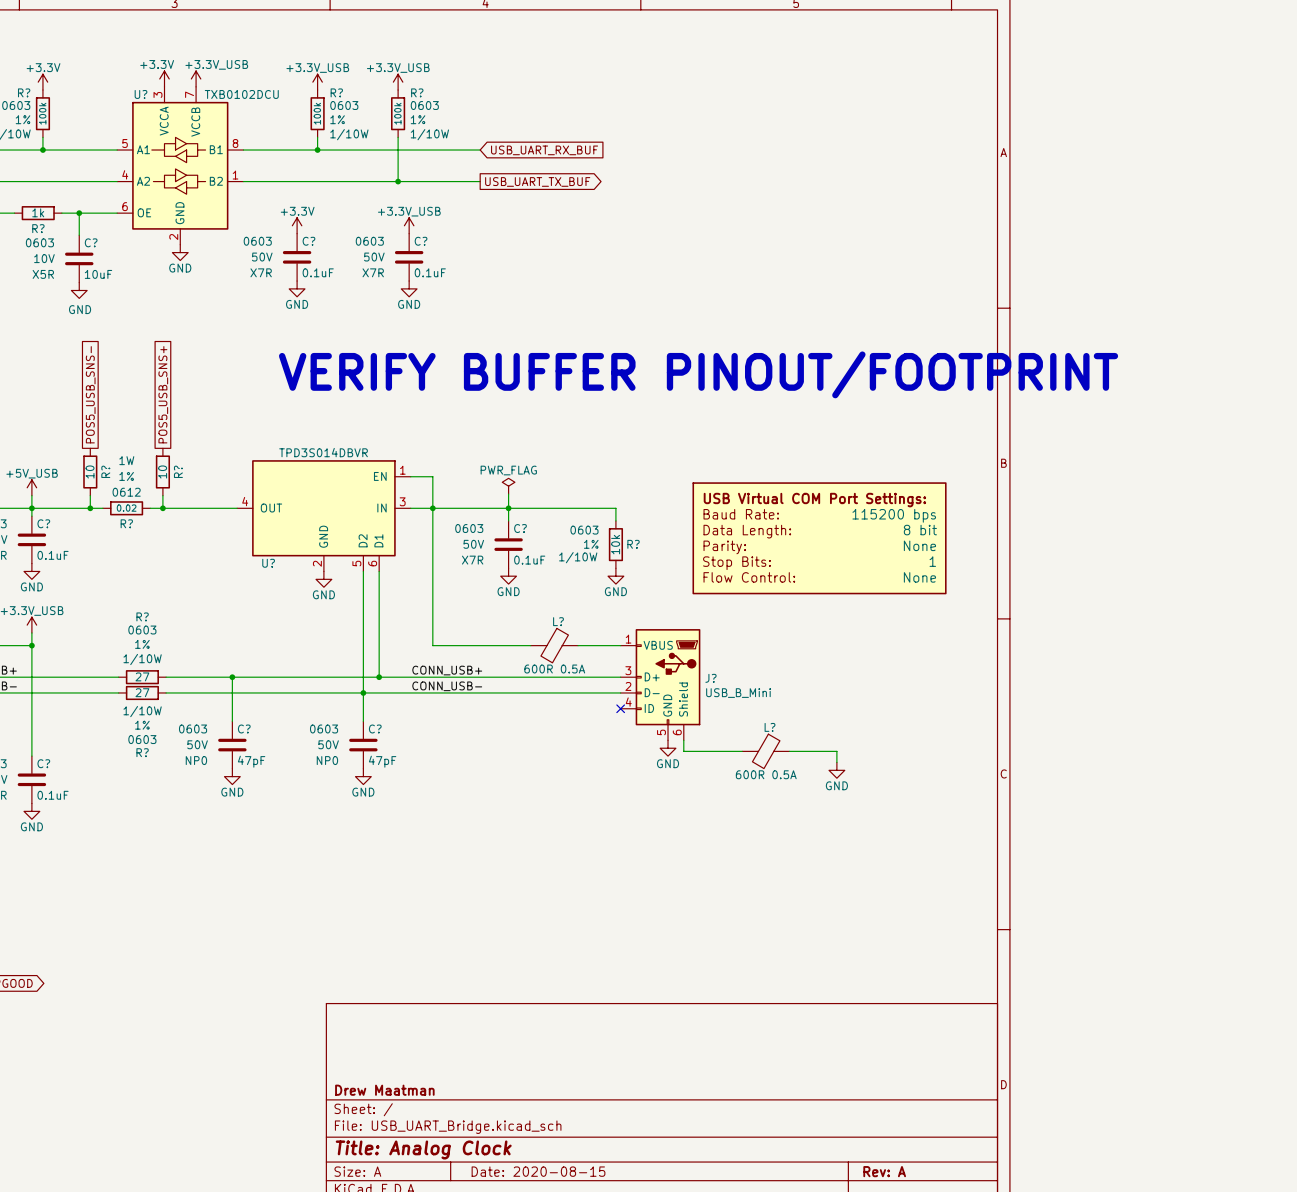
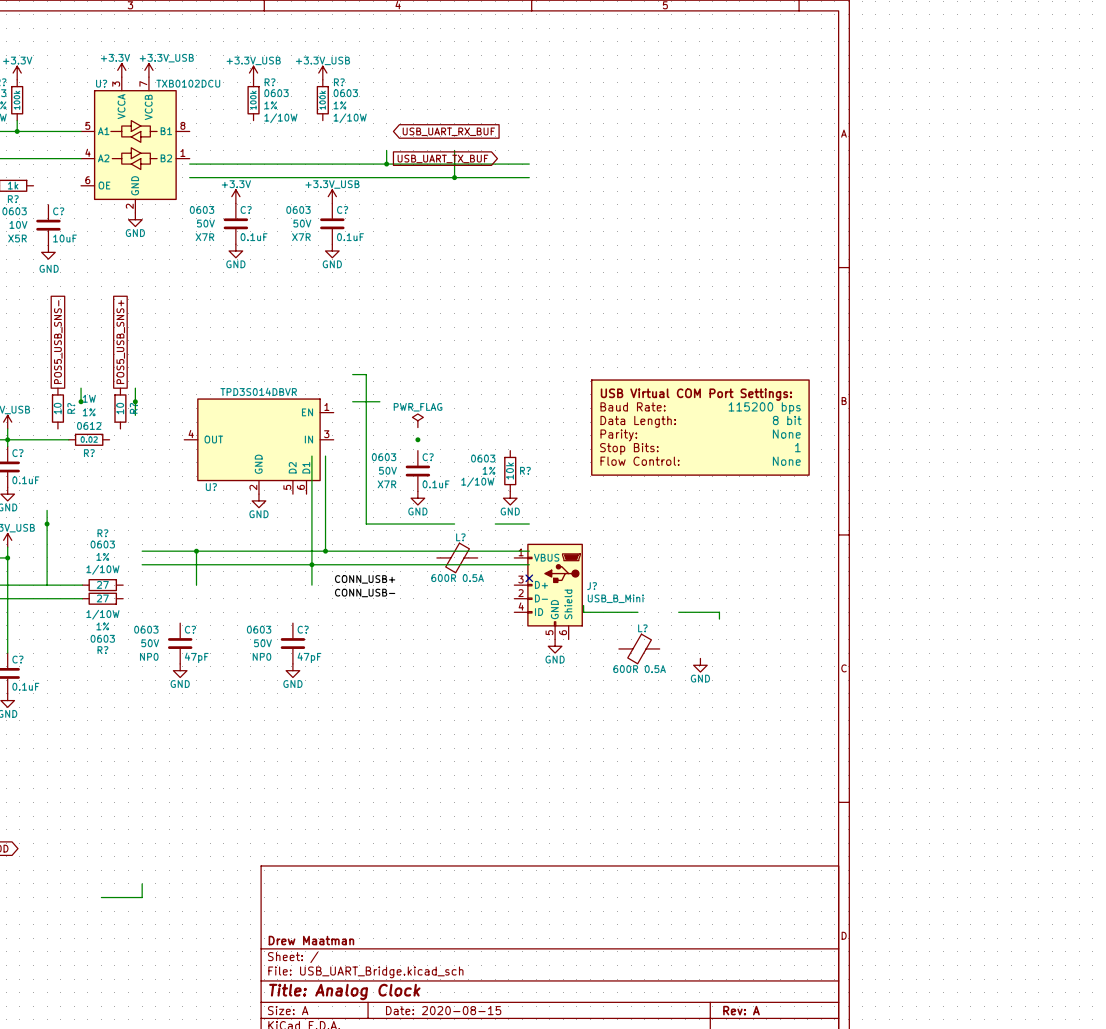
wire: (317, 137) (317, 150) -> none
wire: (398, 137) (398, 181) -> none
wire: (243, 150) (480, 150) -> none
junction: (317, 150) -> none
wire: none -> (386, 150) (386, 164)
wire: none -> (454, 150) (454, 177)
wire: (243, 181) (480, 181) -> none
junction: (398, 181) -> none
wire: none -> (189, 164) (529, 164)
junction: none -> (386, 164)
wire: none -> (189, 177) (529, 177)
junction: none -> (454, 177)
wire: (61, 213) (117, 213) -> none
wire: (79, 213) (79, 235) -> none
junction: (79, 213) -> none
text: VERIFY BUFFER PINOUT/FOOTPRINT (698, 374) -> none
wire: none -> (352, 374) (366, 374) (366, 524) (454, 524)
wire: none -> (81, 388) (81, 401)
wire: none -> (135, 388) (135, 415)
junction: none -> (81, 401)
junction: none -> (135, 401)
wire: none -> (352, 401) (379, 401)
wire: (410, 476) (432, 476) (432, 645) (530, 645) -> none
wire: (508, 494) (508, 520) -> none
wire: (90, 495) (90, 508) -> none
wire: (162, 495) (162, 508) -> none
junction: (90, 508) -> none
wire: (150, 508) (237, 508) -> none
junction: (162, 508) -> none
wire: (410, 508) (615, 508) (615, 520) -> none
junction: (432, 508) -> none
wire: none -> (325, 456) (325, 551)
part position: (819, 538) -> (700, 427)
wire: (363, 571) (363, 721) -> (311, 456) (311, 585)
wire: (379, 571) (379, 677) -> none
wire: none -> (47, 510) (47, 585)
junction: none -> (47, 524)
wire: none -> (495, 524) (529, 524)
wire: none -> (142, 551) (529, 551)
wire: none -> (196, 551) (196, 585)
junction: none -> (196, 551)
junction: none -> (325, 551)
wire: (578, 645) (620, 645) -> none
wire: none -> (142, 564) (529, 564)
junction: none -> (311, 564)
no-connect mark: none -> (529, 578)
wire: (166, 677) (620, 677) -> none
wire: (232, 677) (232, 721) -> none
junction: (232, 677) -> none
junction: (379, 677) -> none
wire: (166, 692) (620, 692) -> none
junction: (363, 692) -> none
wire: none -> (583, 605) (583, 612) (637, 612)
no-connect mark: (620, 708) -> none
wire: none -> (678, 612) (719, 612) (719, 619)
wire: (683, 740) (683, 751) (742, 751) -> none
wire: (789, 751) (836, 751) (836, 762) -> none
wire: none -> (142, 883) (142, 897) (101, 897)

